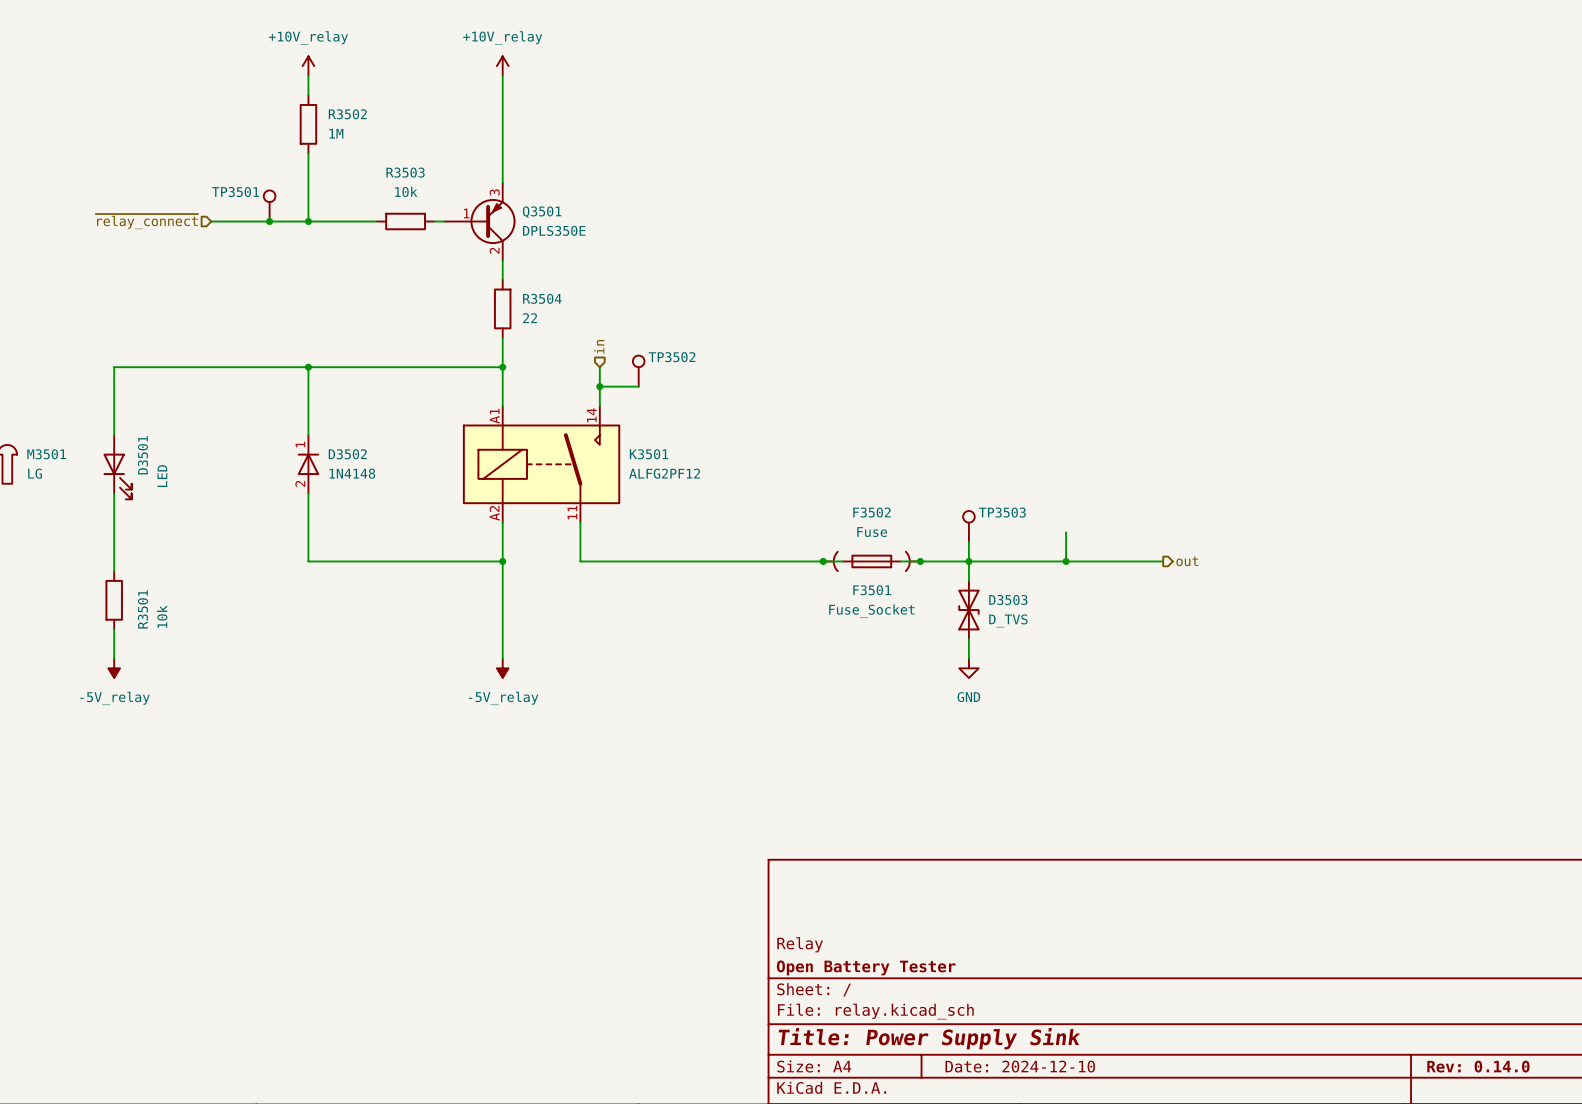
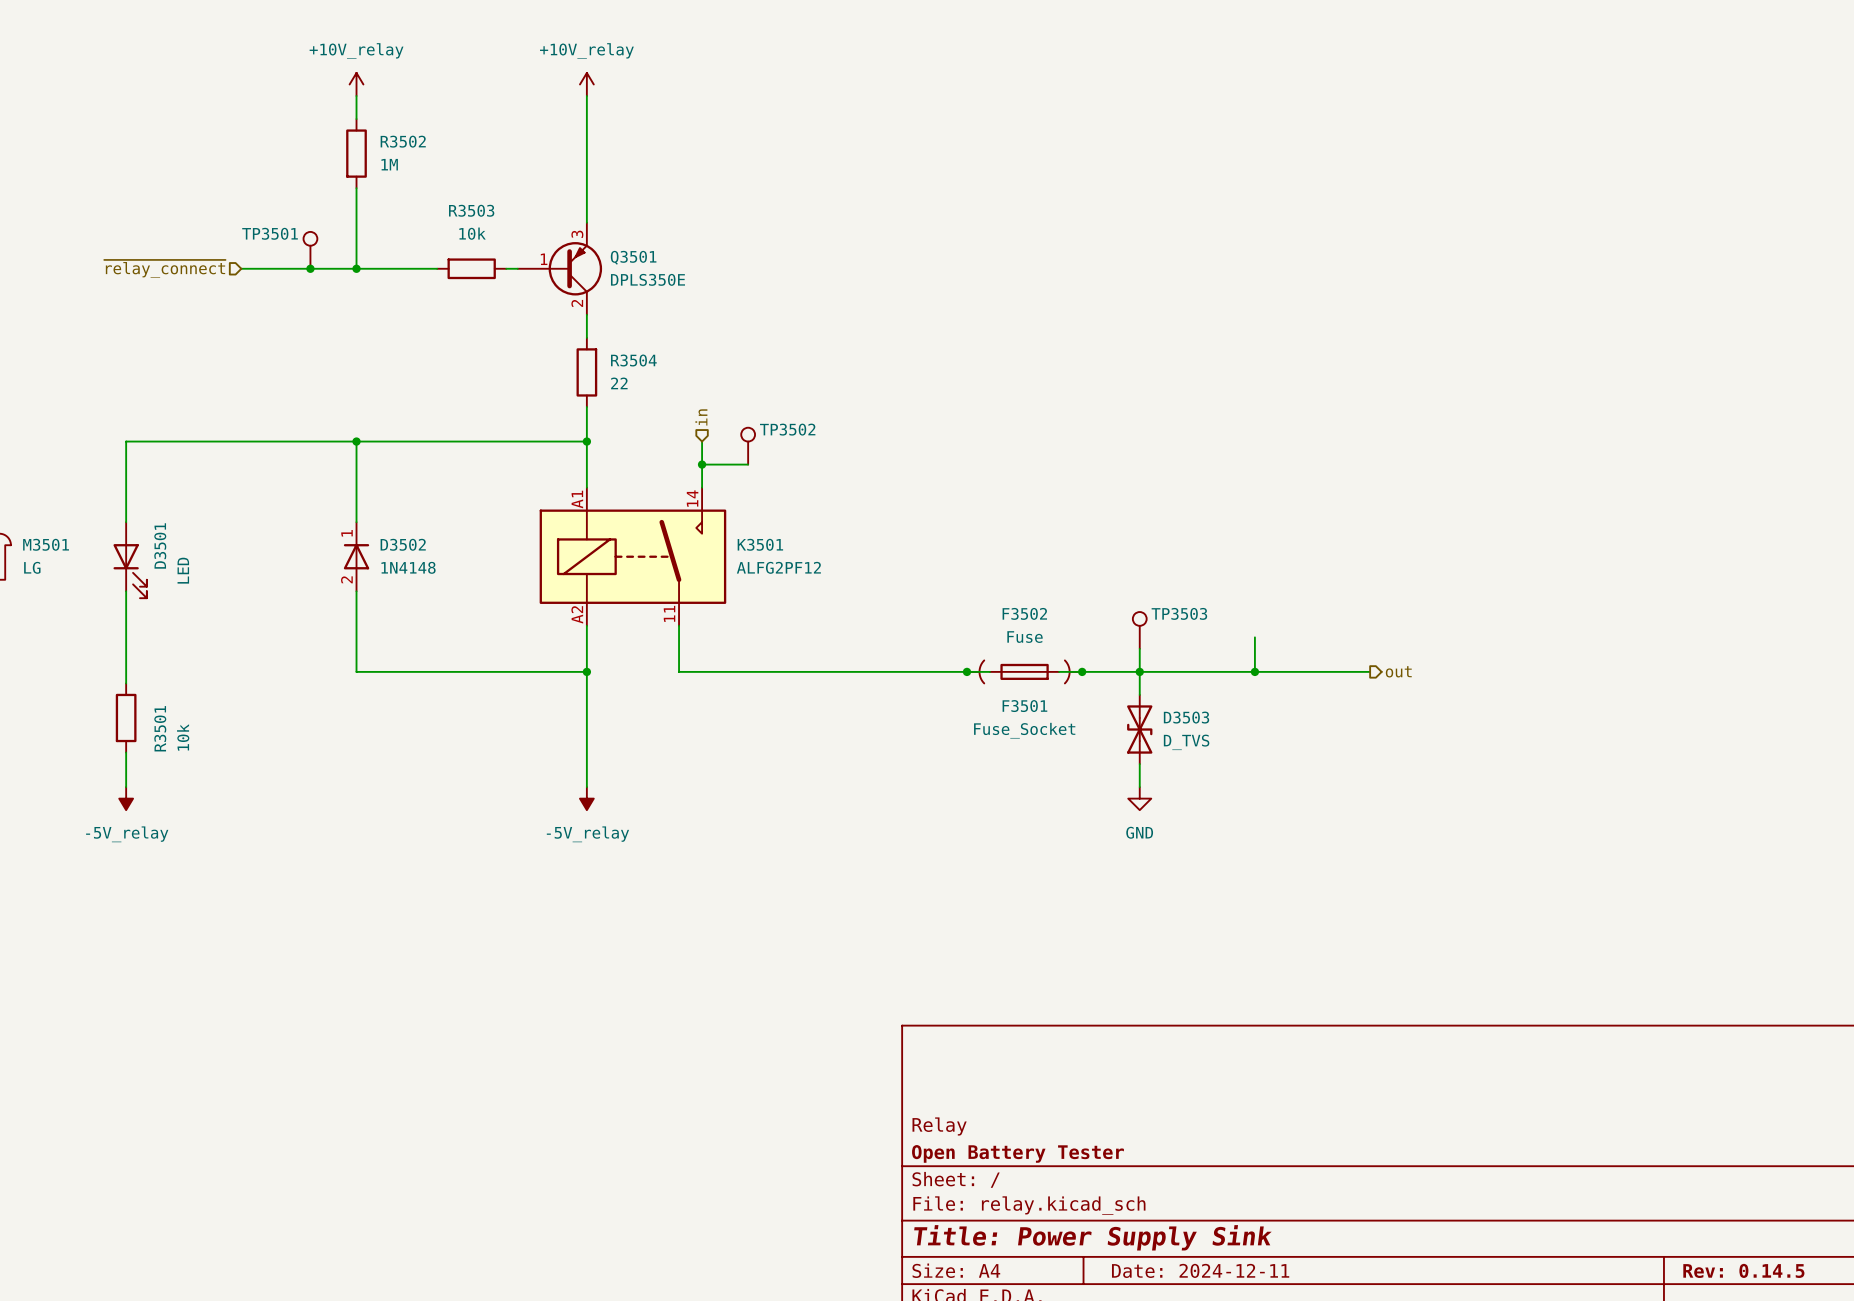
title block: Date: 2024-12-10 (1020, 1066) -> Date: 2024-12-11 (1200, 1270)
title block: Rev: 0.14.0 (1478, 1066) -> Rev: 0.14.5 (1743, 1270)

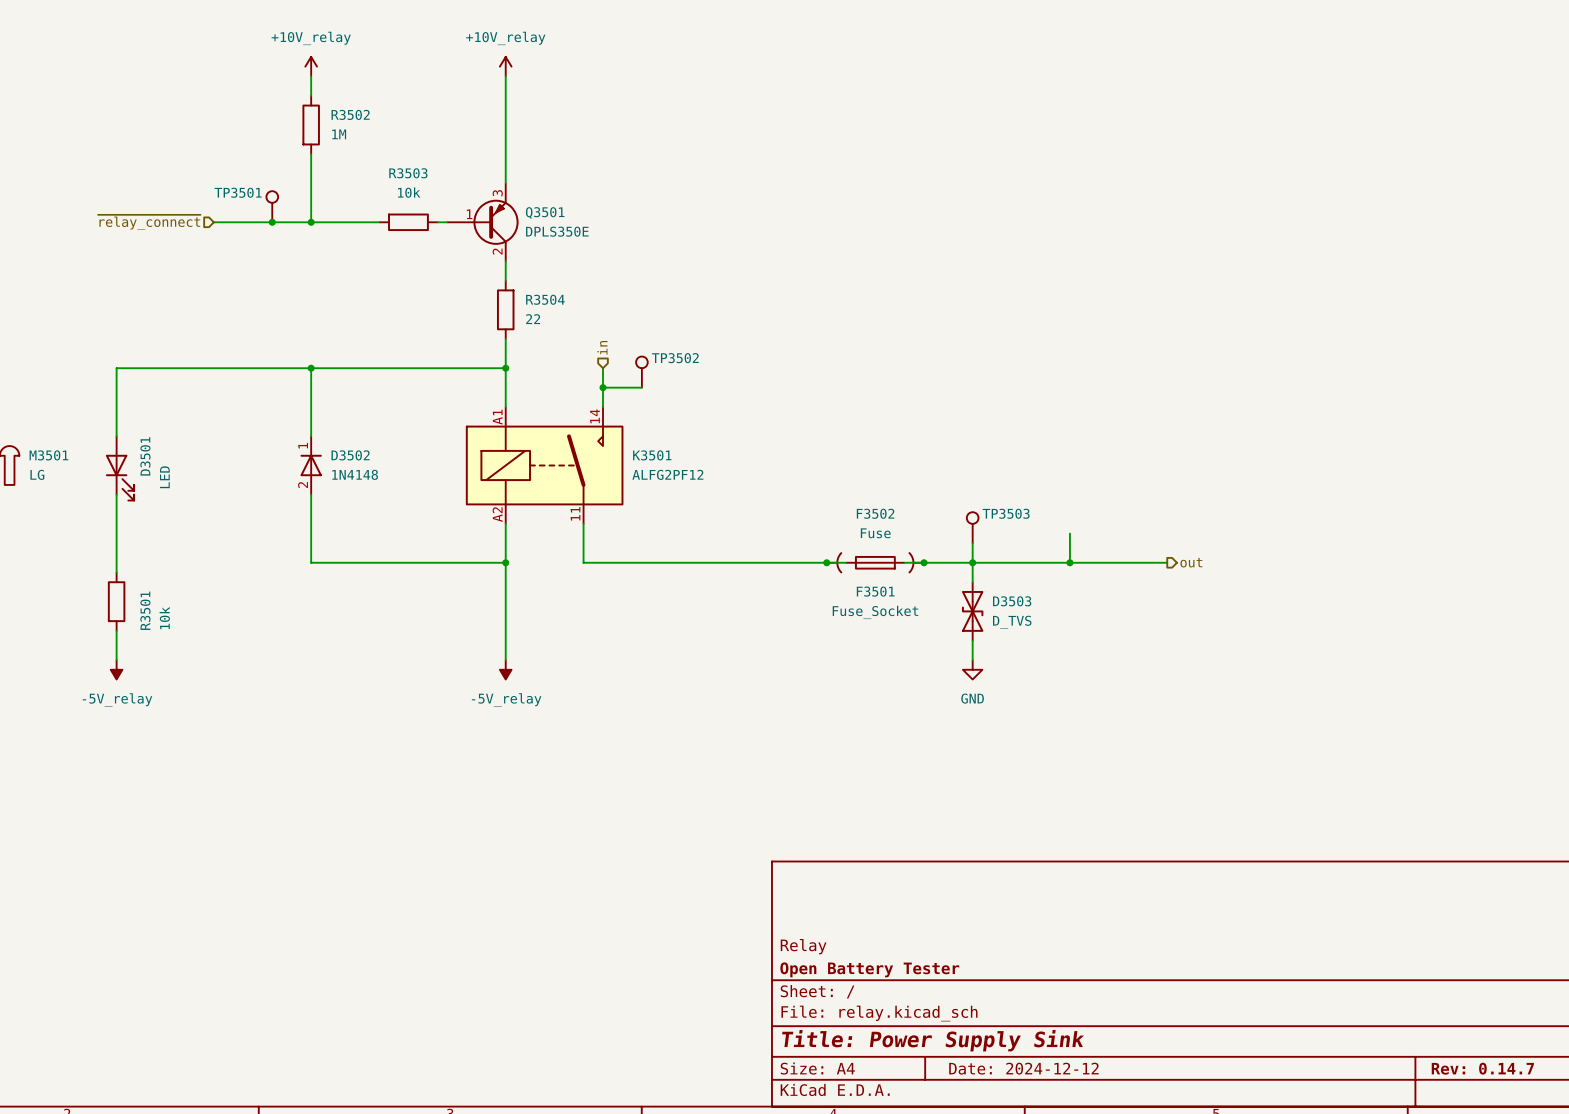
title block: Date: 2024-12-11 (1200, 1270) -> Date: 2024-12-12 (1023, 1068)
title block: Rev: 0.14.5 (1743, 1270) -> Rev: 0.14.7 (1482, 1068)

